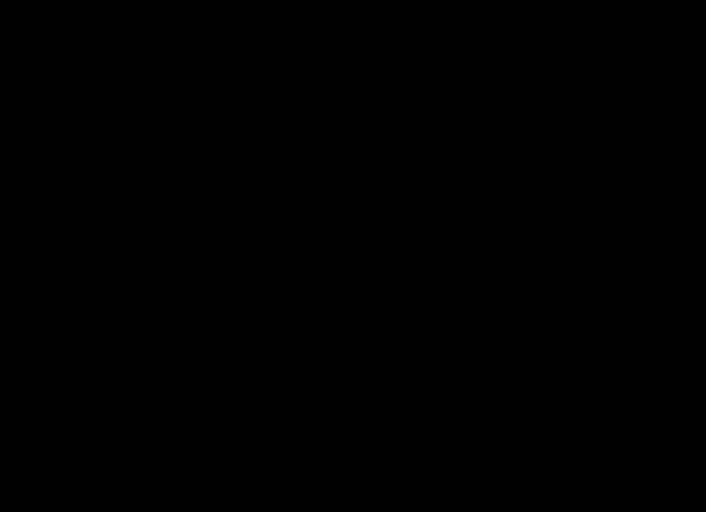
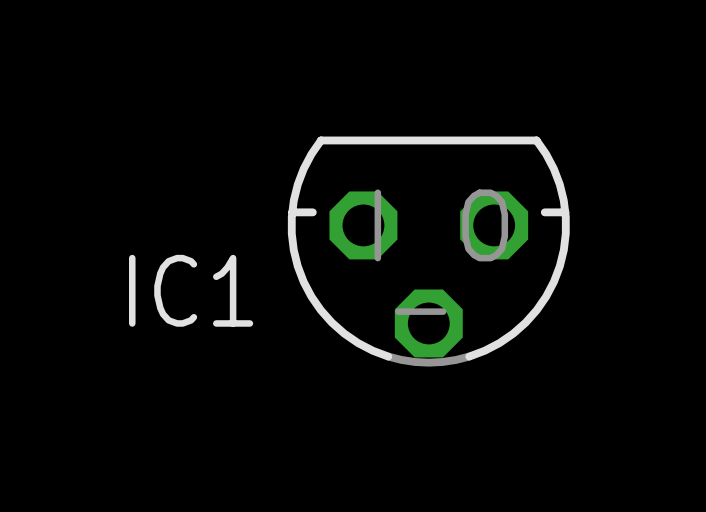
IC1: none -> (428, 251)

